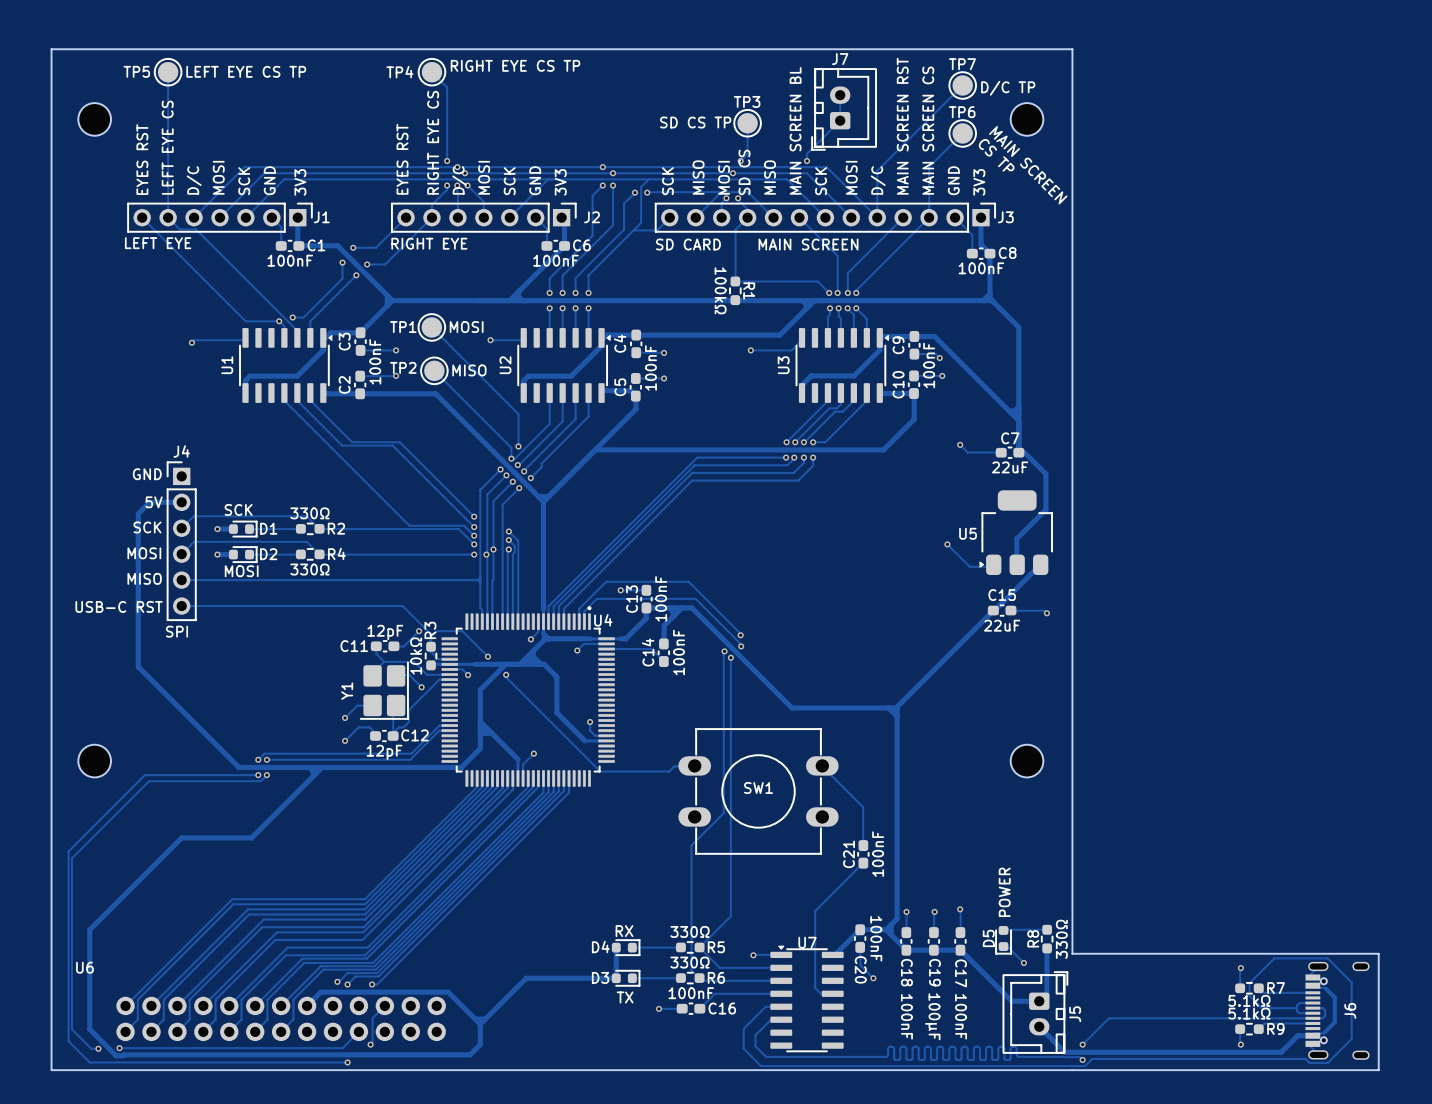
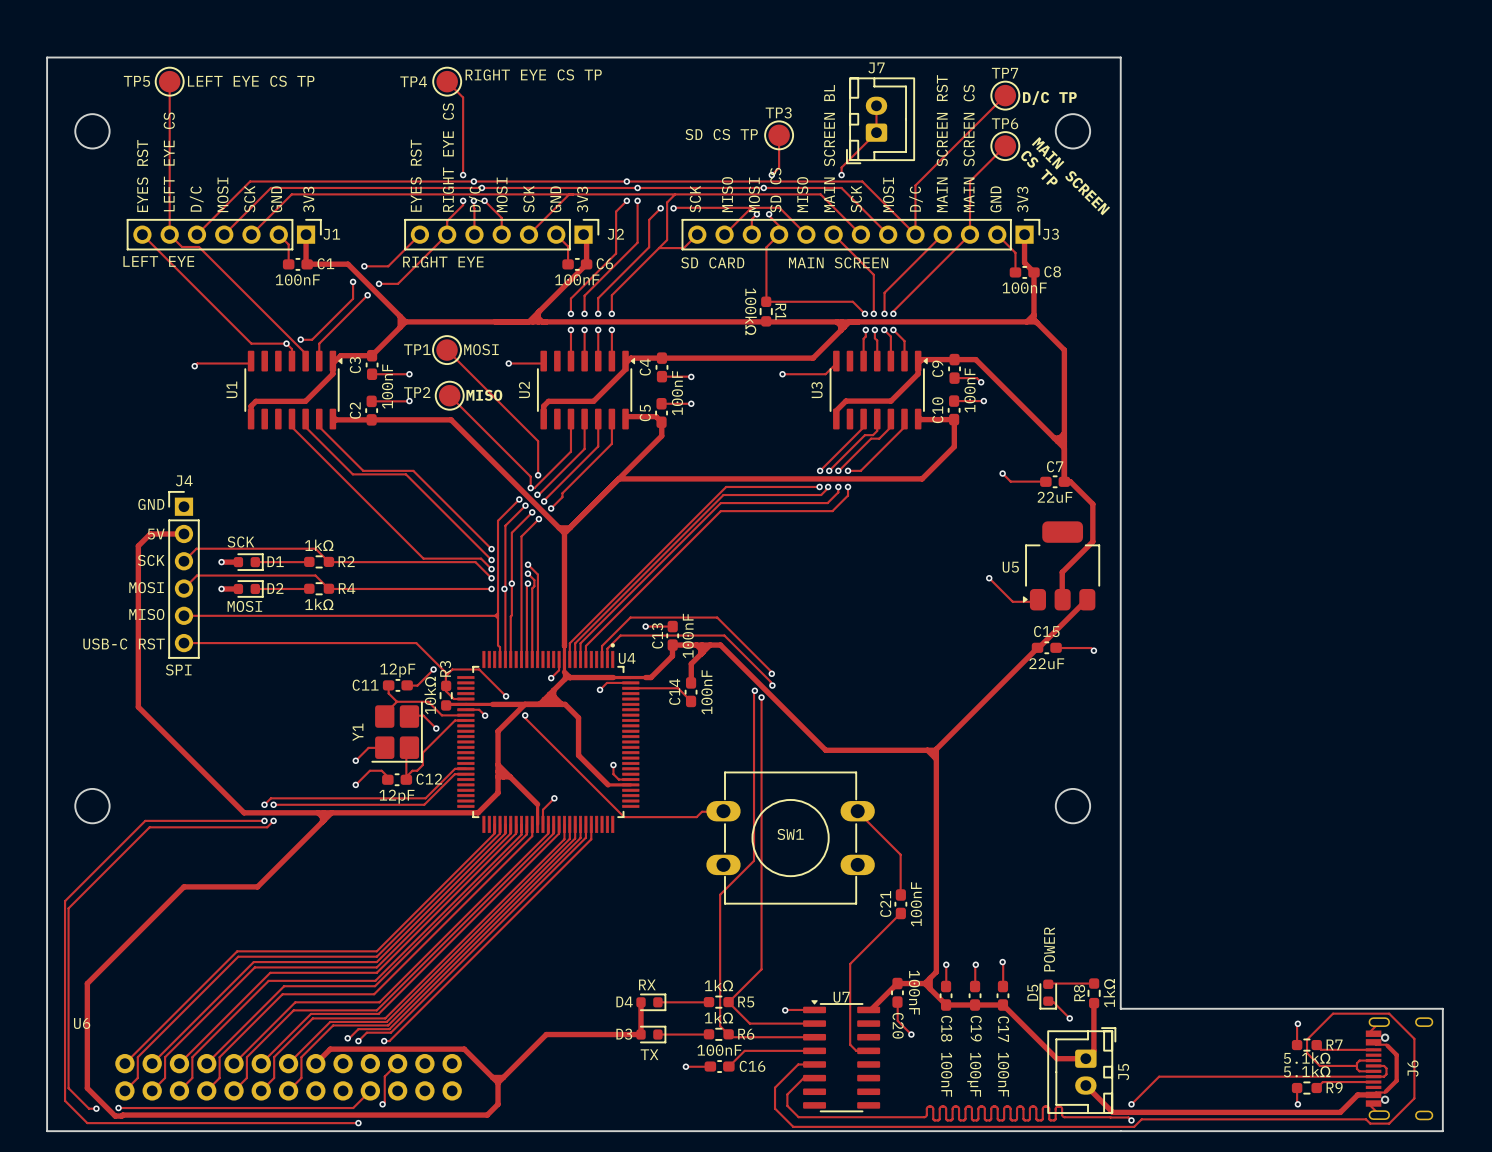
text: 330Ω (309, 513) -> 1kΩ (319, 545)
text: 330Ω (309, 569) -> 1kΩ (319, 604)
text: 330Ω (690, 931) -> 1kΩ (718, 985)
text: 330Ω (1061, 939) -> 1kΩ (1109, 993)
text: 330Ω (690, 962) -> 1kΩ (718, 1017)

